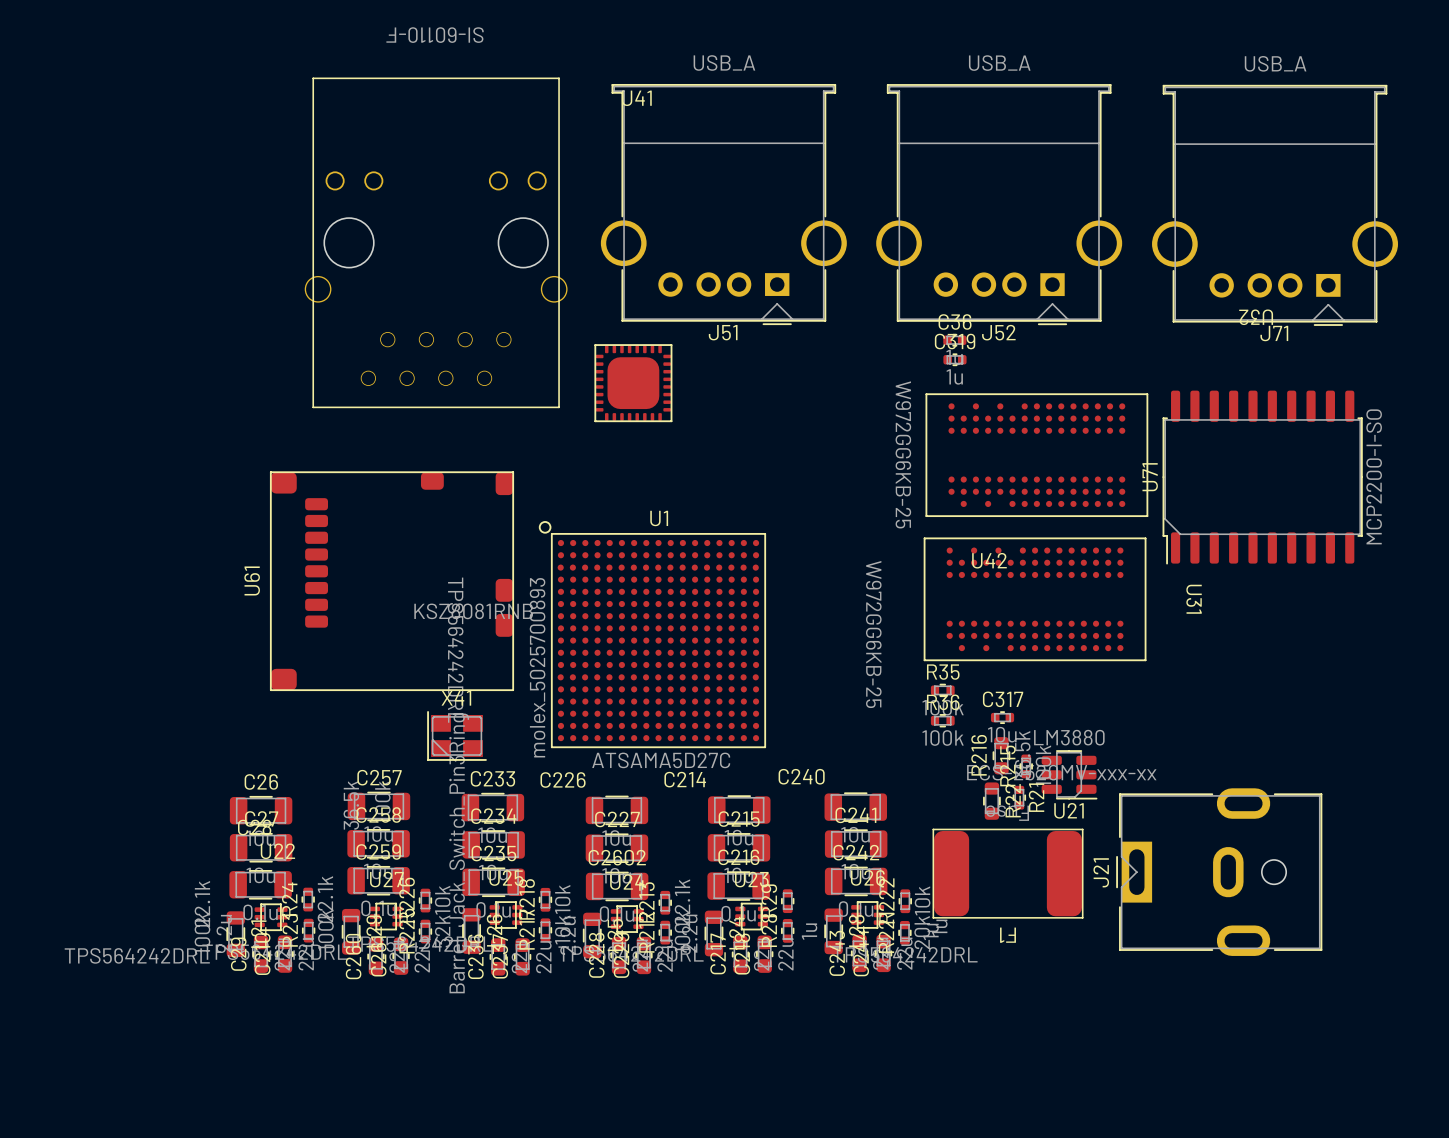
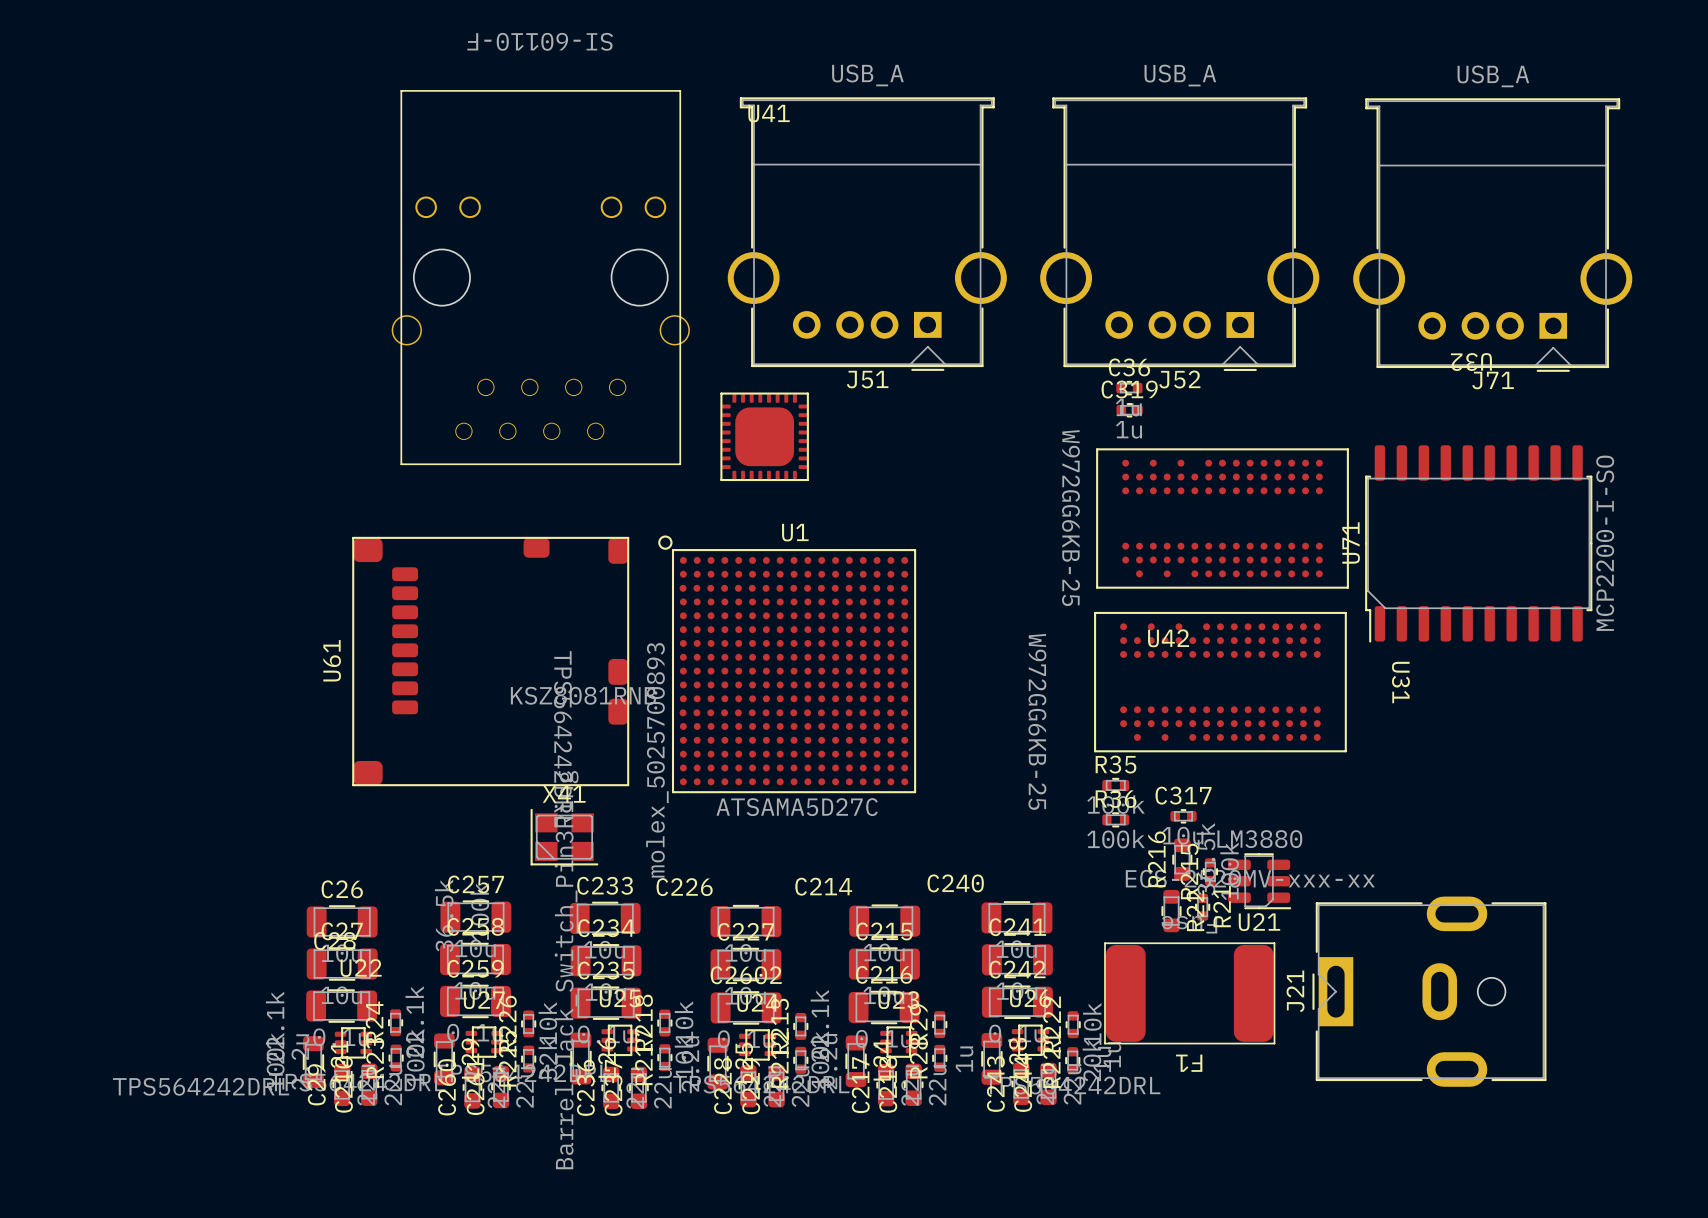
U1 position: (652, 634) -> (787, 664)

